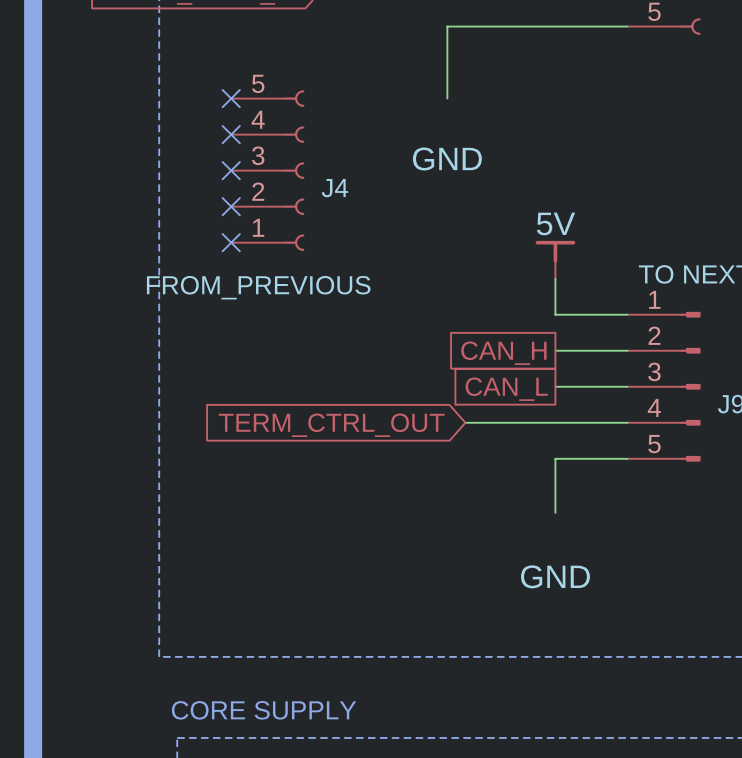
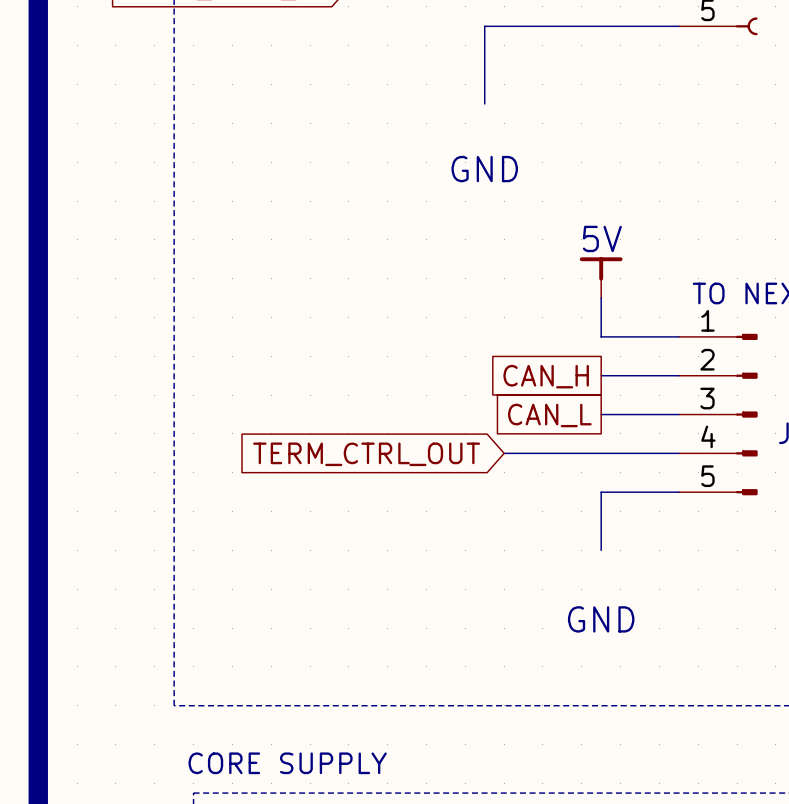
no-connect mark: (231, 98) -> none
no-connect mark: (231, 134) -> none
no-connect mark: (231, 170) -> none
J4: FROM_PREVIOUS (267, 170) -> none
no-connect mark: (231, 206) -> none
no-connect mark: (231, 242) -> none

